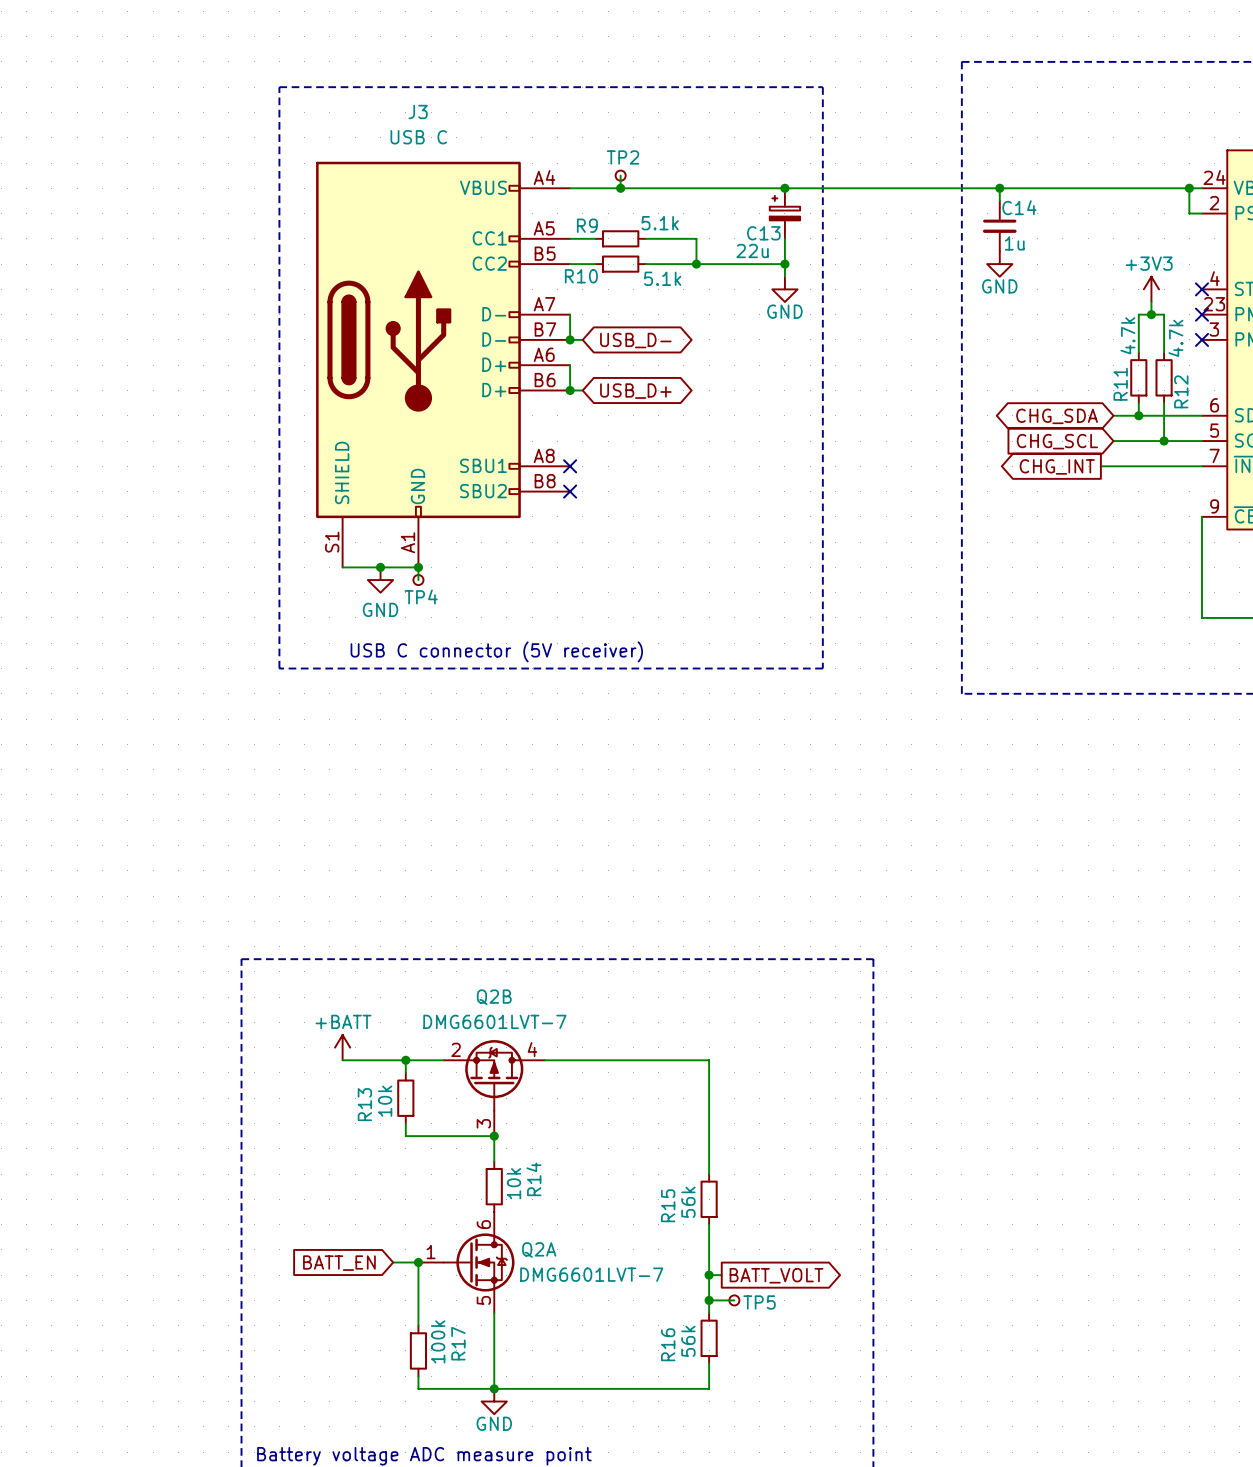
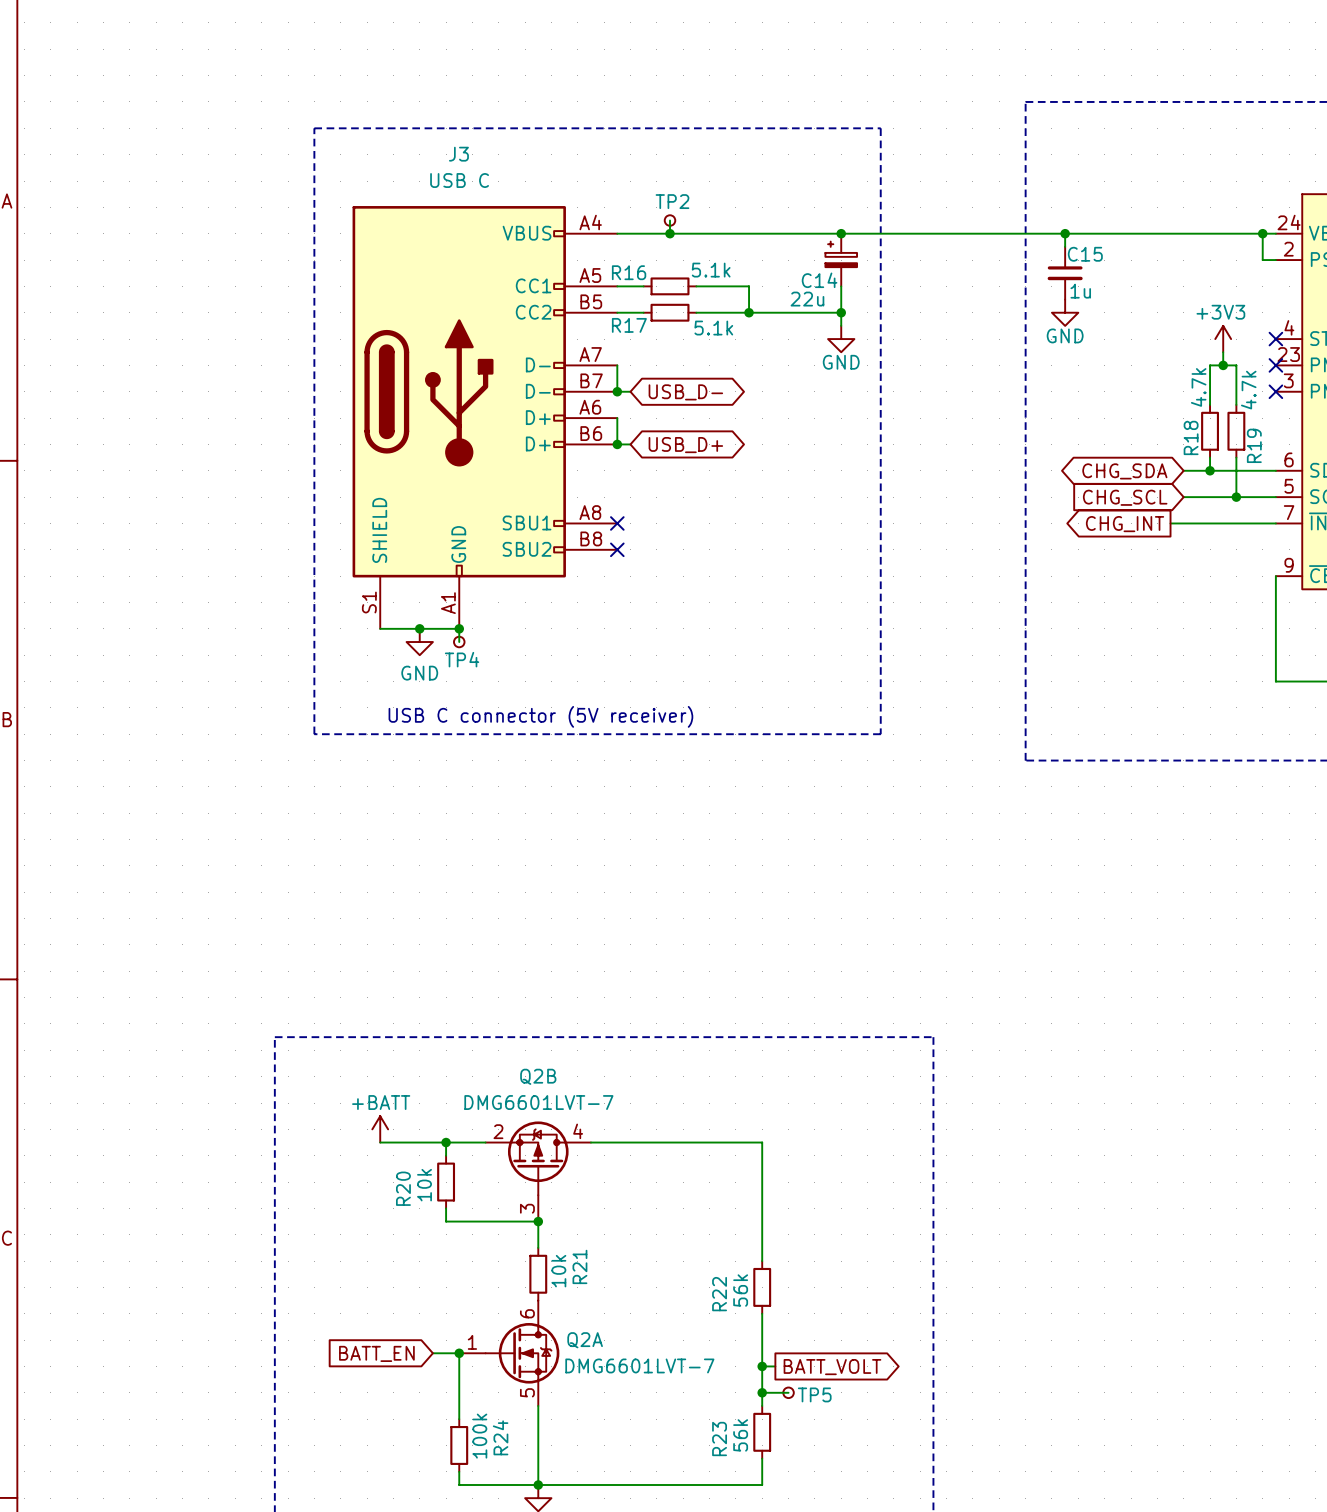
C14 name: C14 (1019, 207) -> C15 (1085, 254)
R9 name: R9 (587, 225) -> R16 (629, 272)
C13 name: C13 (763, 233) -> C14 (819, 280)
R10 name: R10 (581, 276) -> R17 (629, 325)
R11 name: R11 (1120, 384) -> R18 (1191, 437)
R12 name: R12 (1181, 391) -> R19 (1254, 445)
R13 name: R13 (364, 1104) -> R20 (403, 1188)
R14 name: R14 (533, 1179) -> R21 (579, 1266)
R15 name: R15 (668, 1205) -> R22 (719, 1294)
R17 name: R17 (458, 1343) -> R24 (500, 1437)
R16 name: R16 (668, 1344) -> R23 (719, 1438)

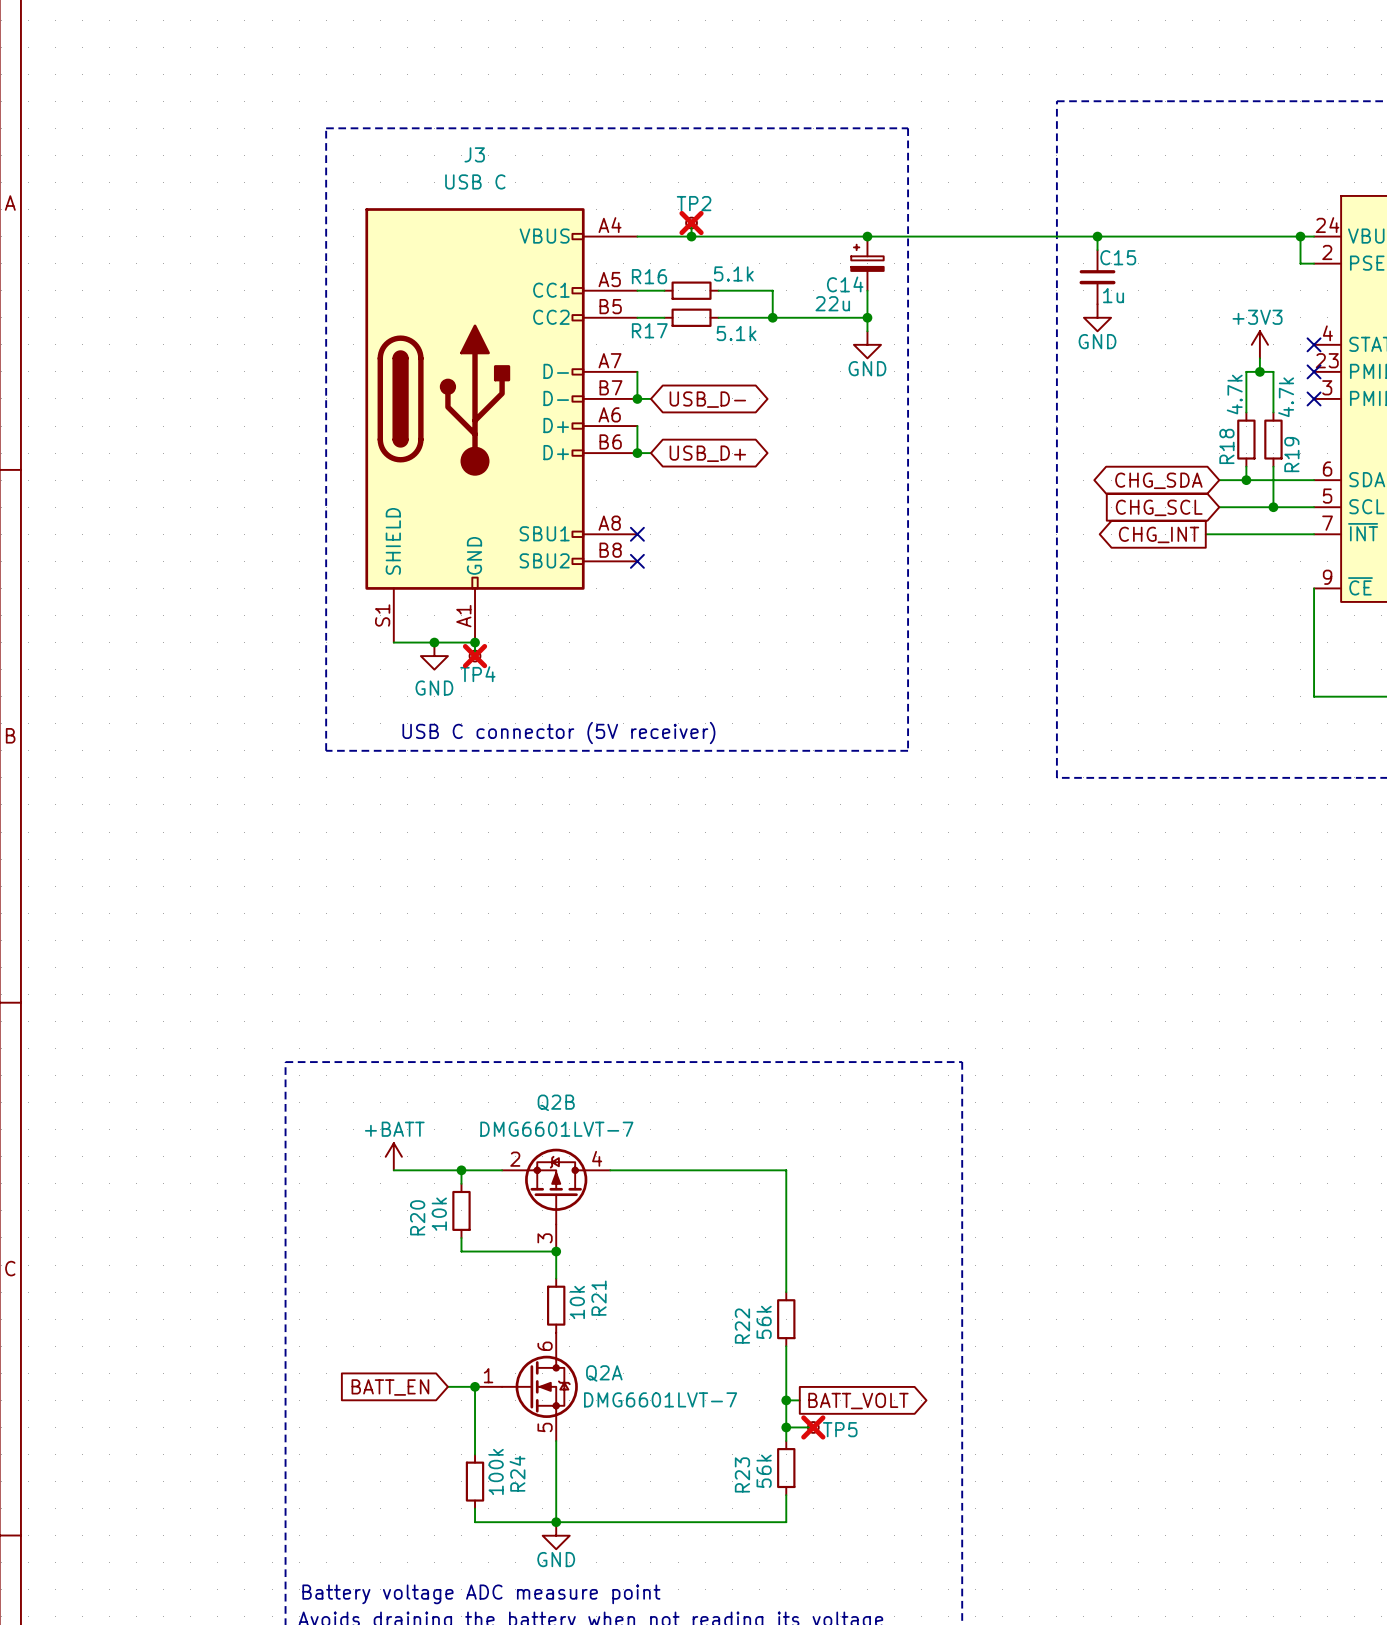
TP2 do-not-place cross: none -> (691, 223)
TP4 do-not-place cross: none -> (475, 656)
TP5 do-not-place cross: none -> (813, 1427)

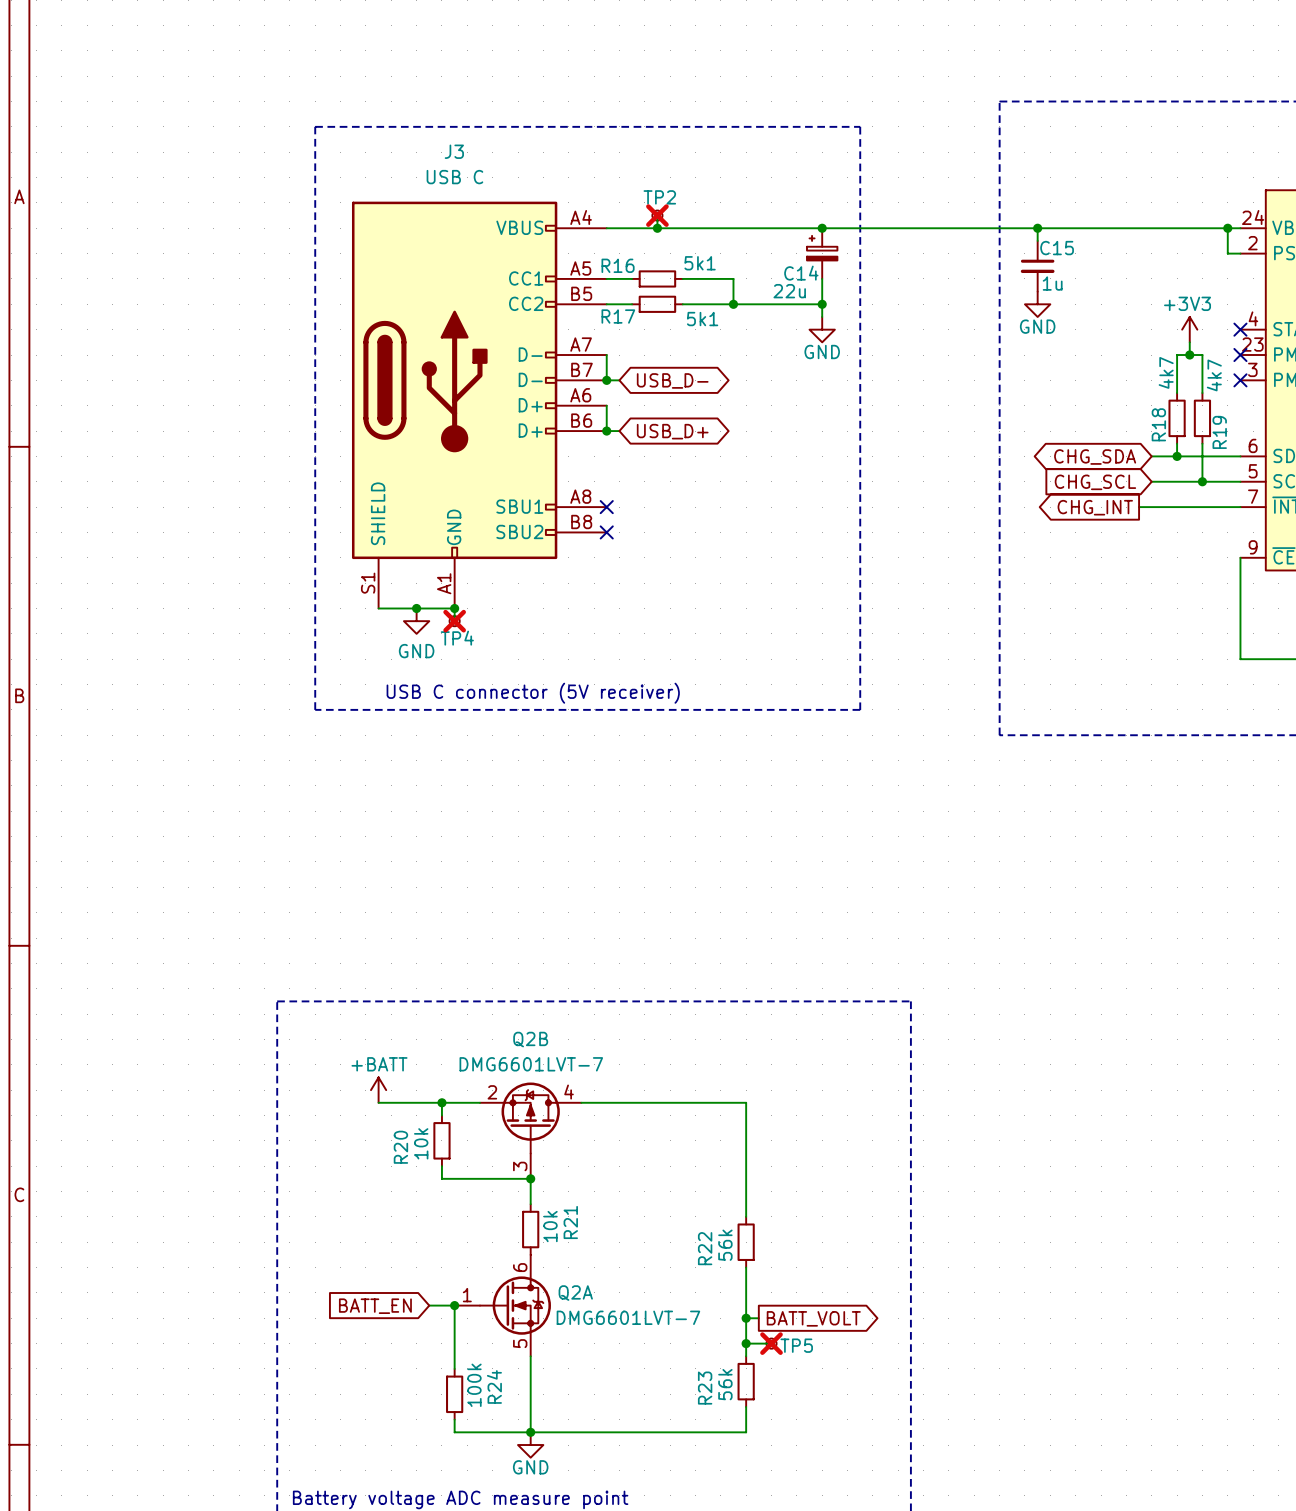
R16 value: 5.1k (733, 273) -> 5k1 (700, 263)
R17 value: 5.1k (736, 333) -> 5k1 (702, 319)
R18 value: 4.7k (1234, 394) -> 4k7 (1166, 372)
R19 value: 4.7k (1286, 397) -> 4k7 (1214, 375)

